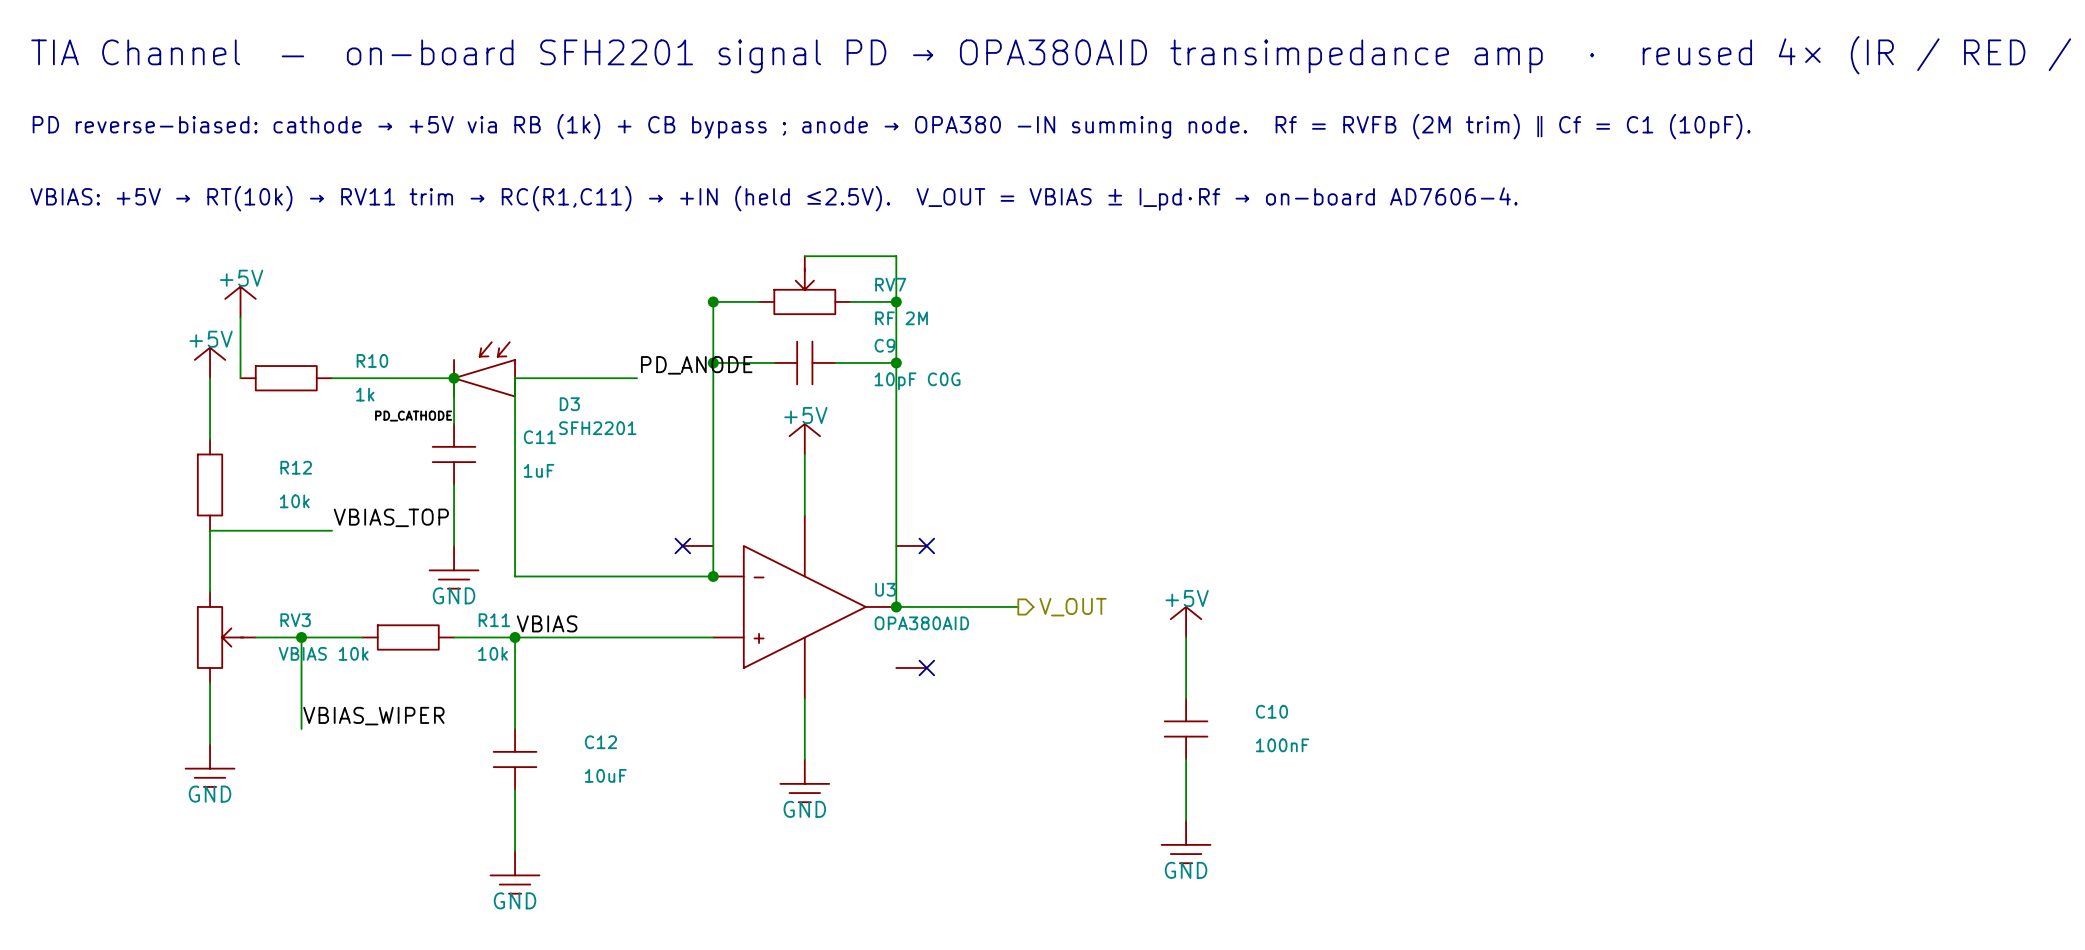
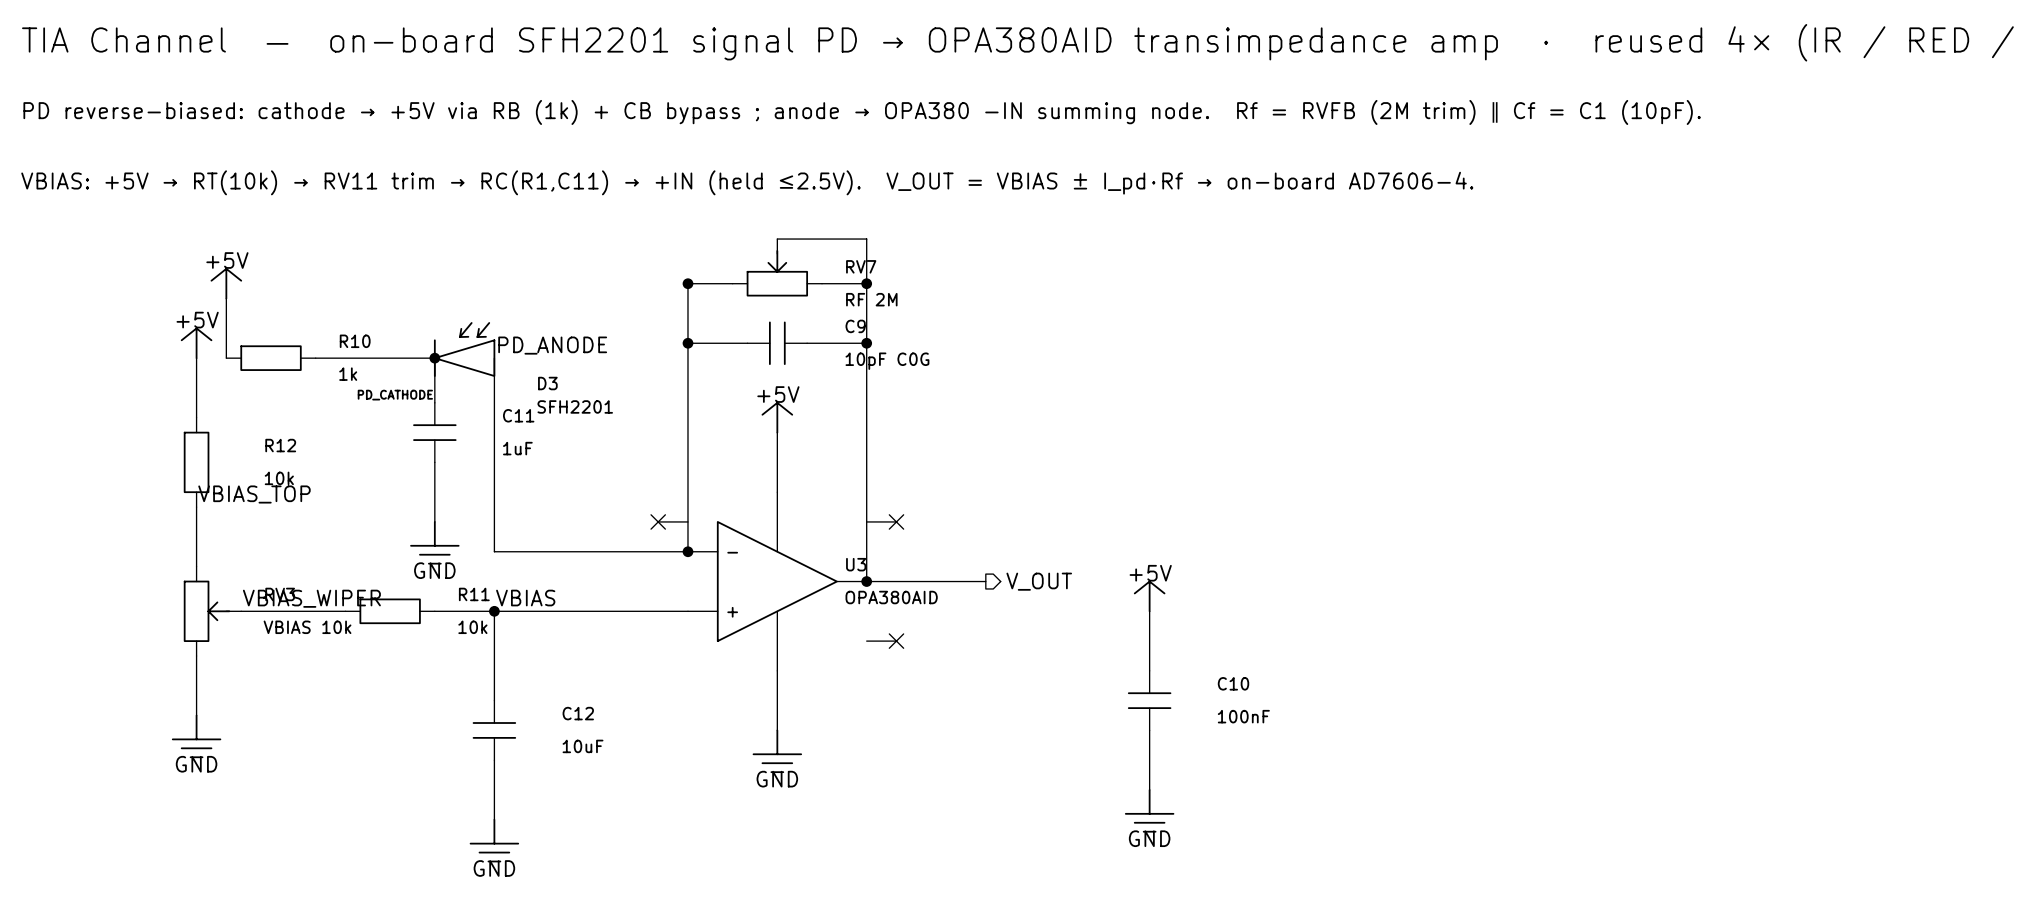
label position: PD_ANODE (696, 365) -> PD_ANODE (552, 345)
wire: (515, 378) (637, 378) -> none
label position: VBIAS_TOP (391, 517) -> VBIAS_TOP (254, 494)
wire: (210, 530) (332, 530) -> none
wire: (301, 637) (301, 728) -> none
junction: (301, 637) -> none
label position: VBIAS_WIPER (373, 716) -> VBIAS_WIPER (311, 598)

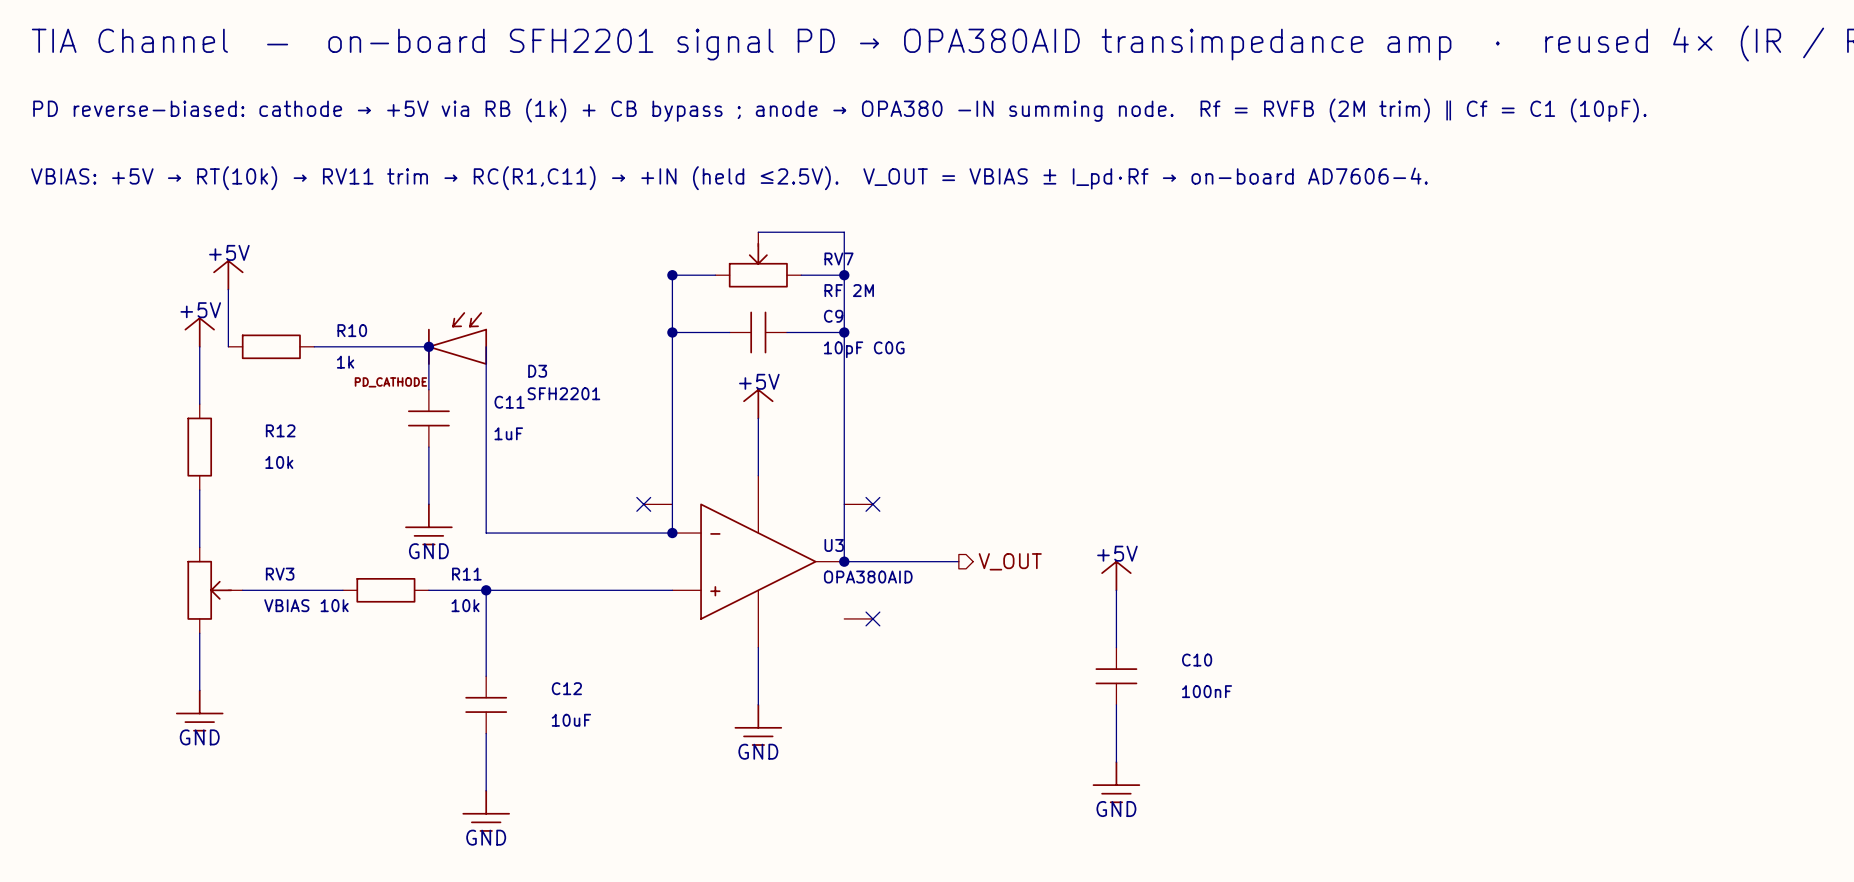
label: PD_ANODE (552, 345) -> none
label: VBIAS_TOP (254, 494) -> none
label: VBIAS_WIPER (311, 598) -> none
label: VBIAS (525, 598) -> none

